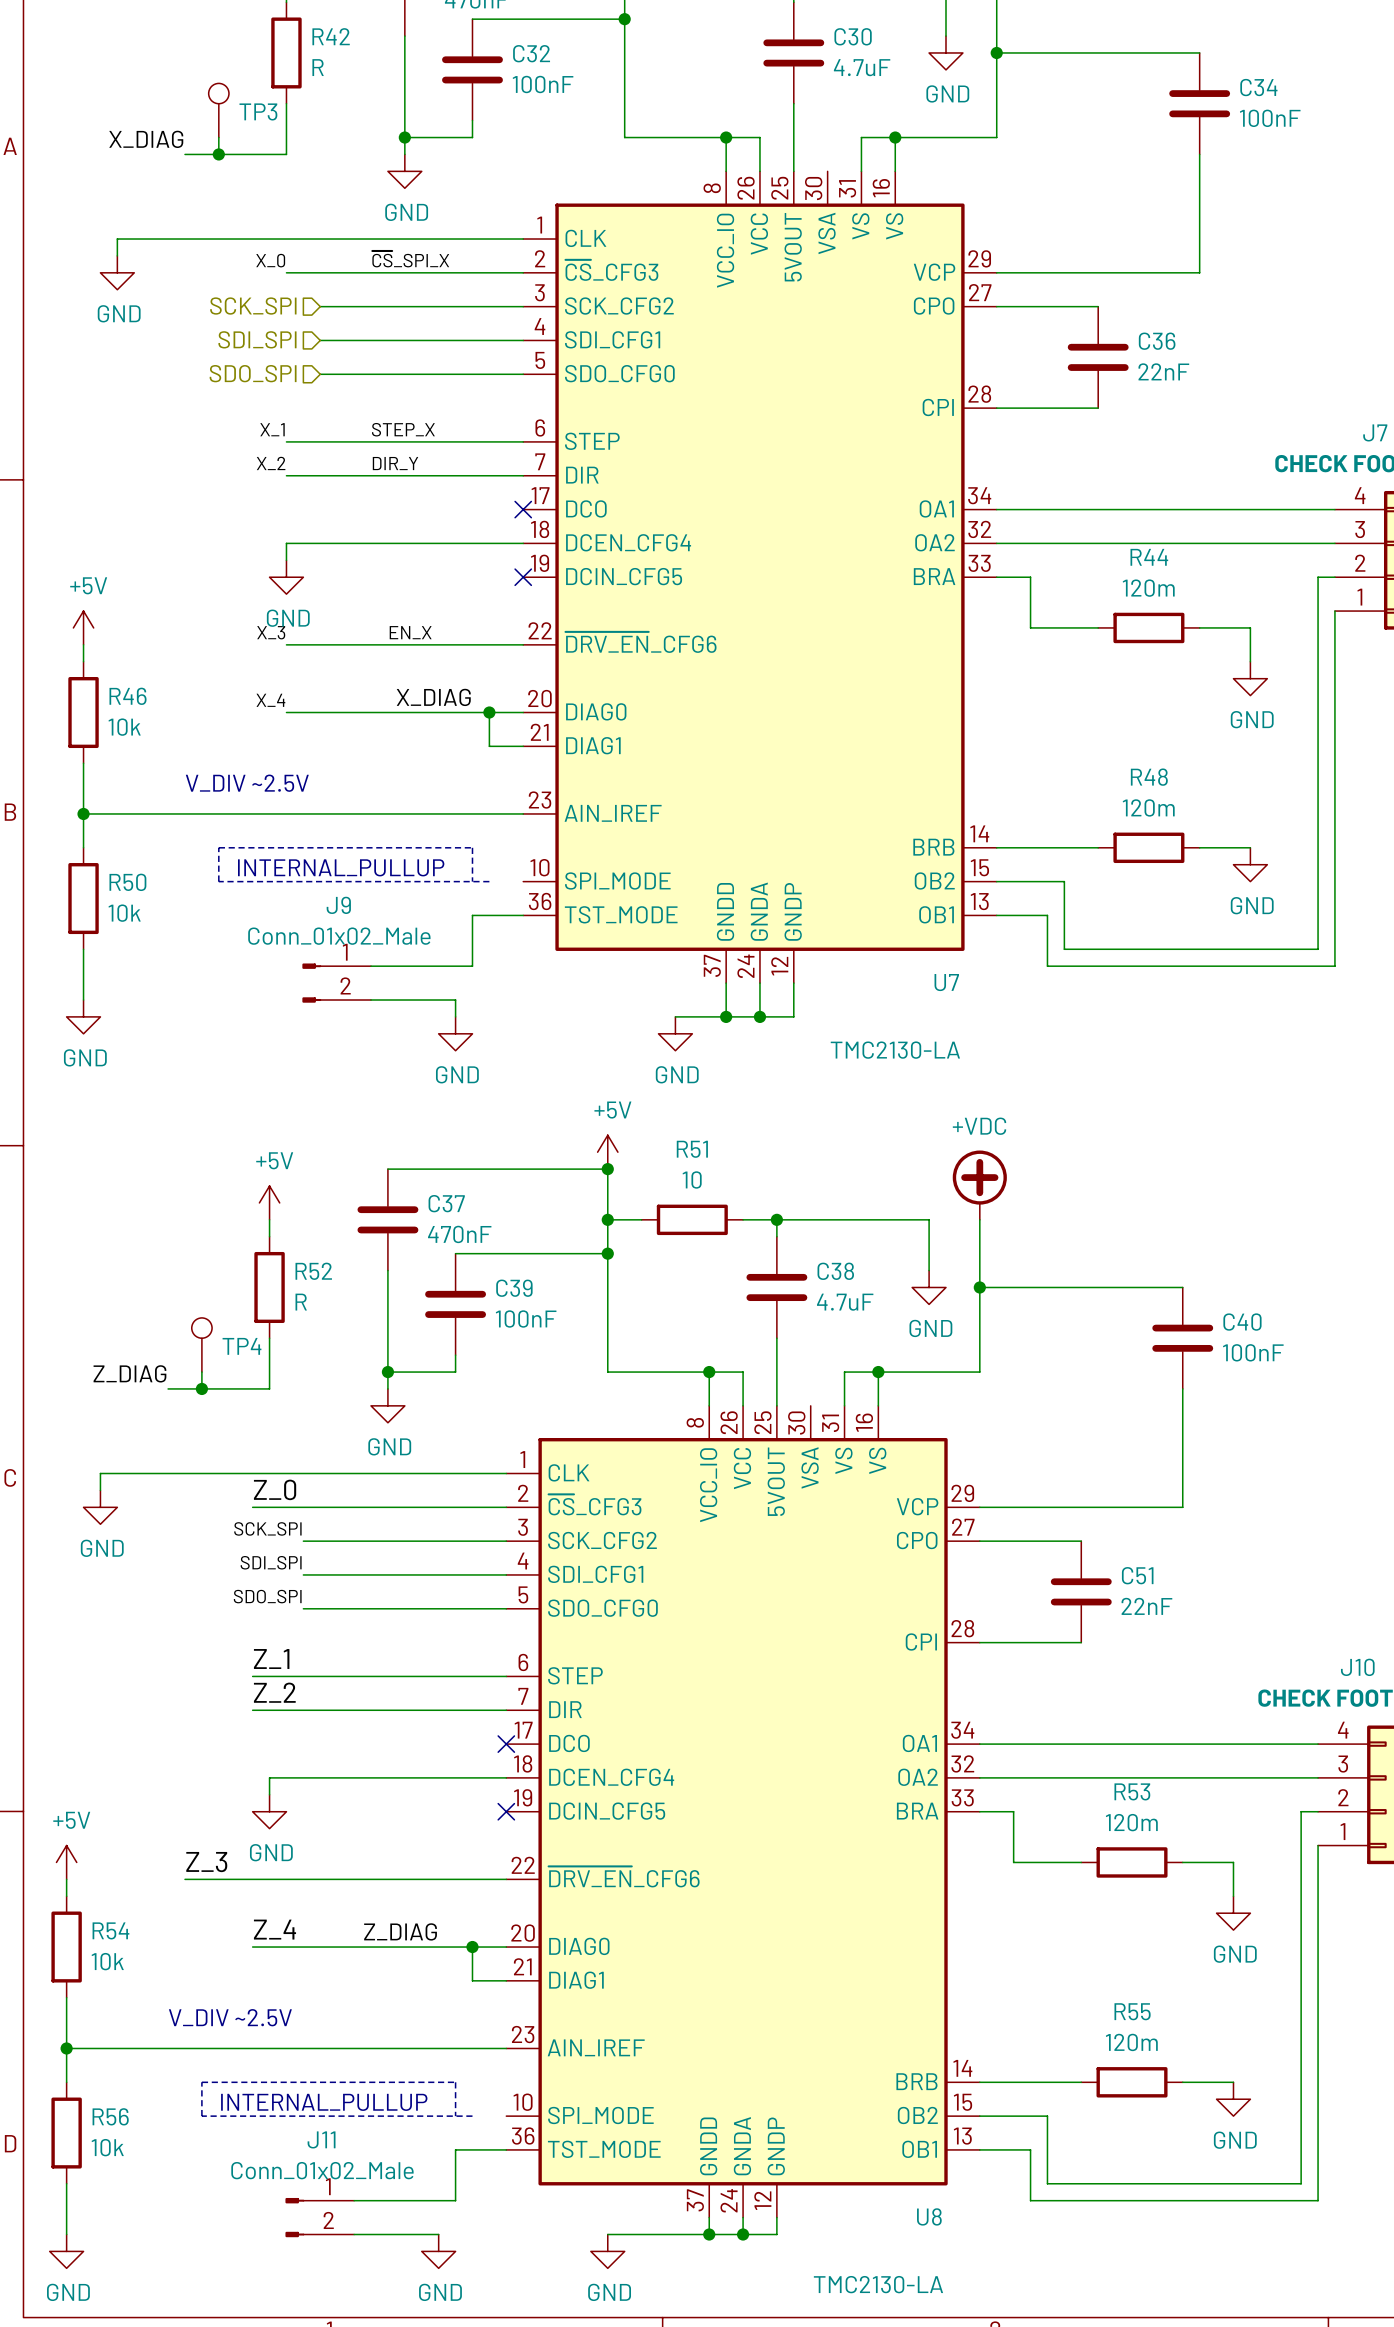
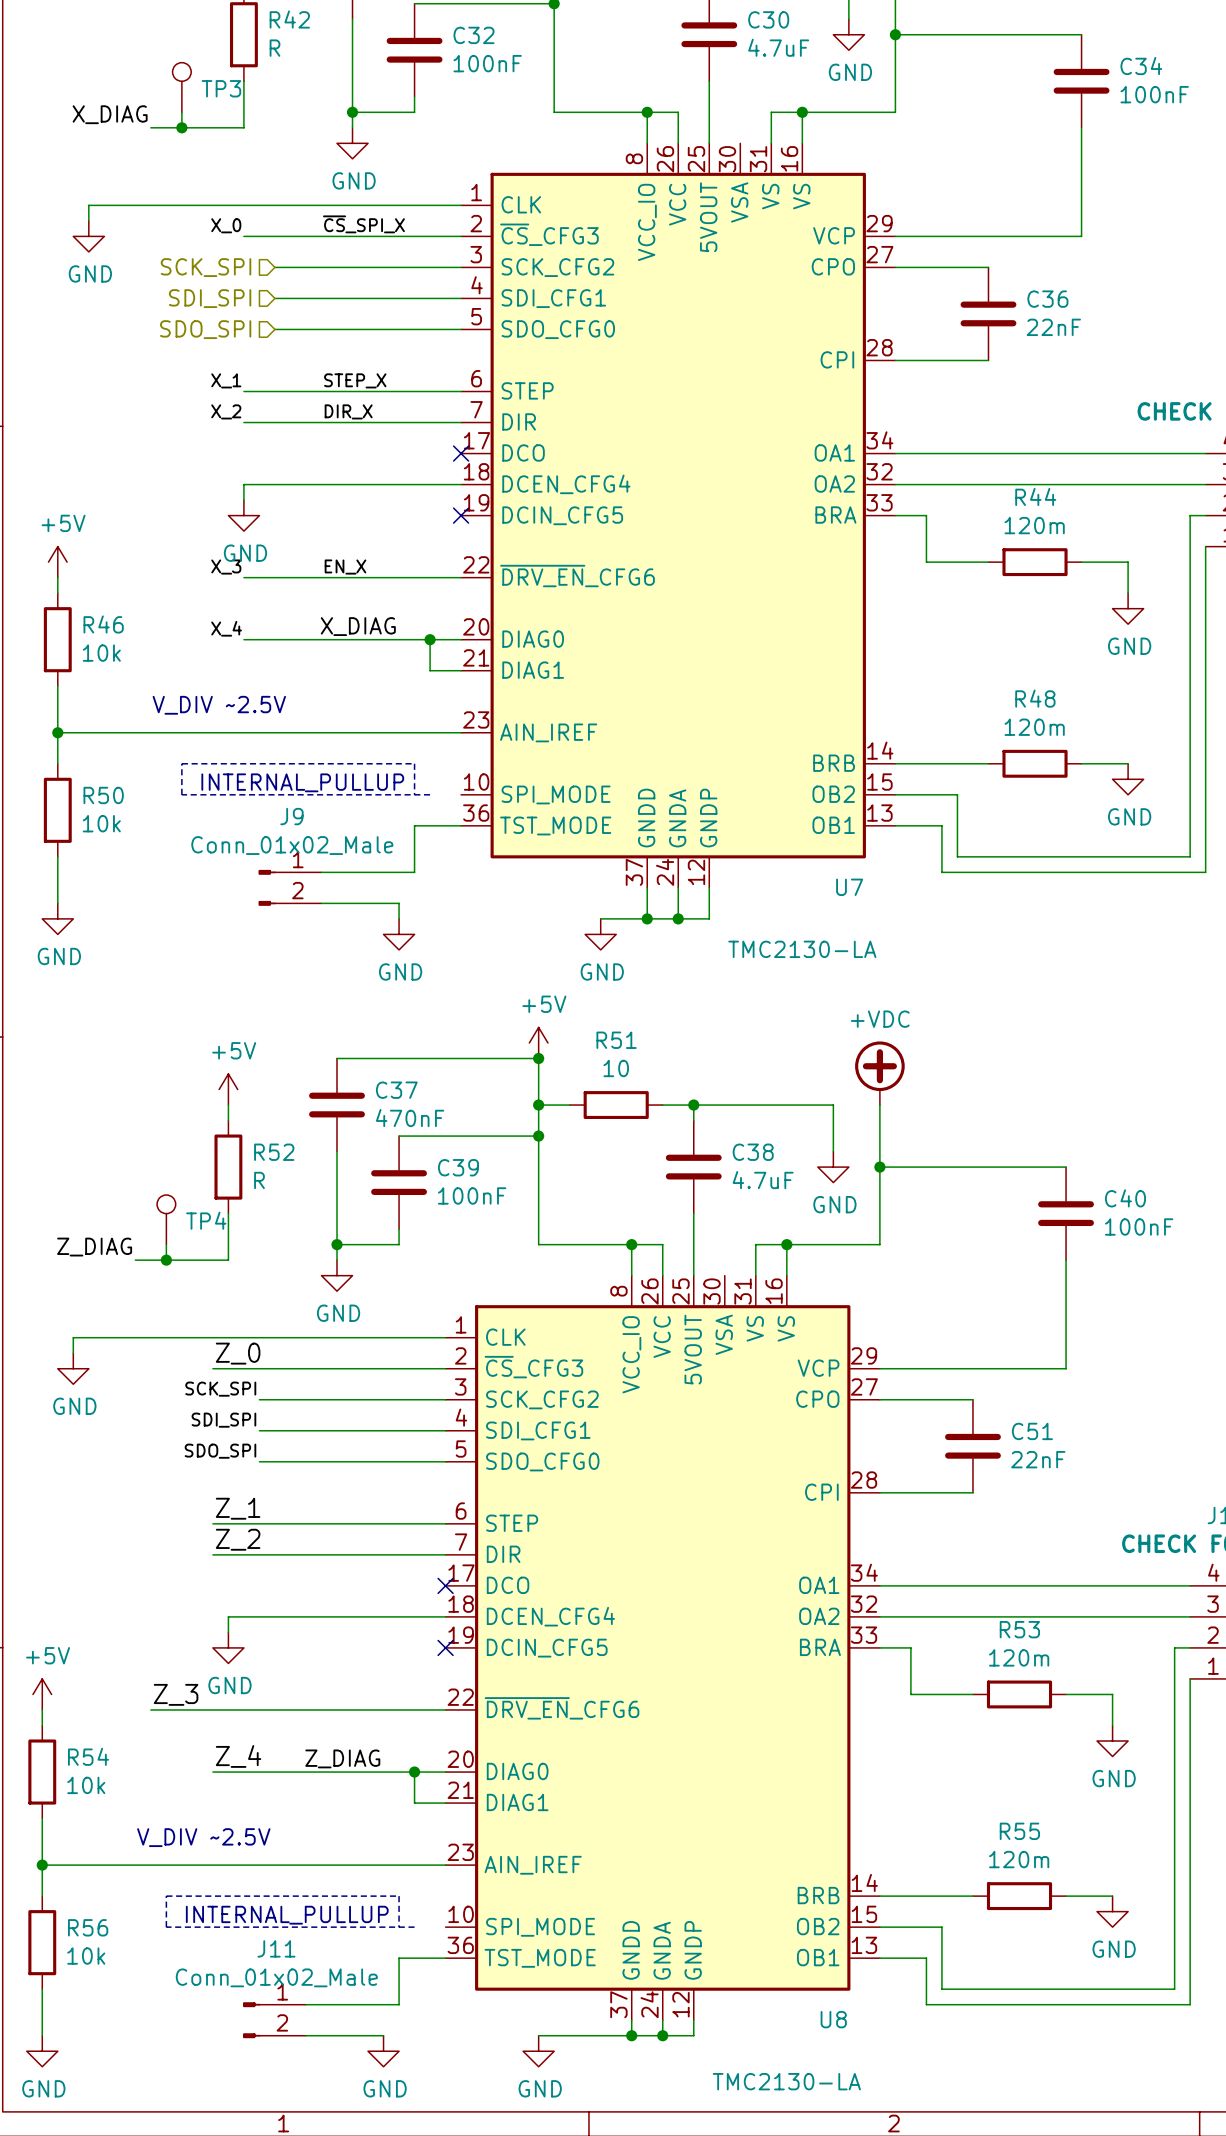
label: DIR_Y (395, 463) -> DIR_X (348, 411)
label position: EN_X (410, 632) -> EN_X (345, 567)
label position: X_DIAG (433, 697) -> X_DIAG (358, 626)

